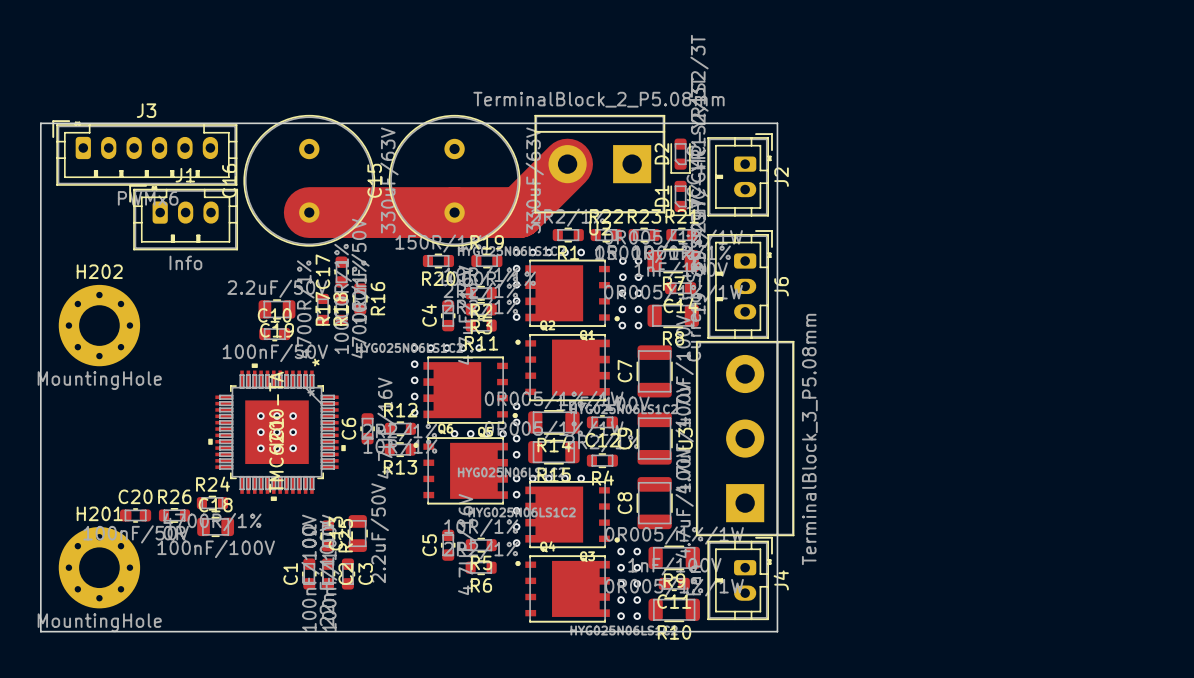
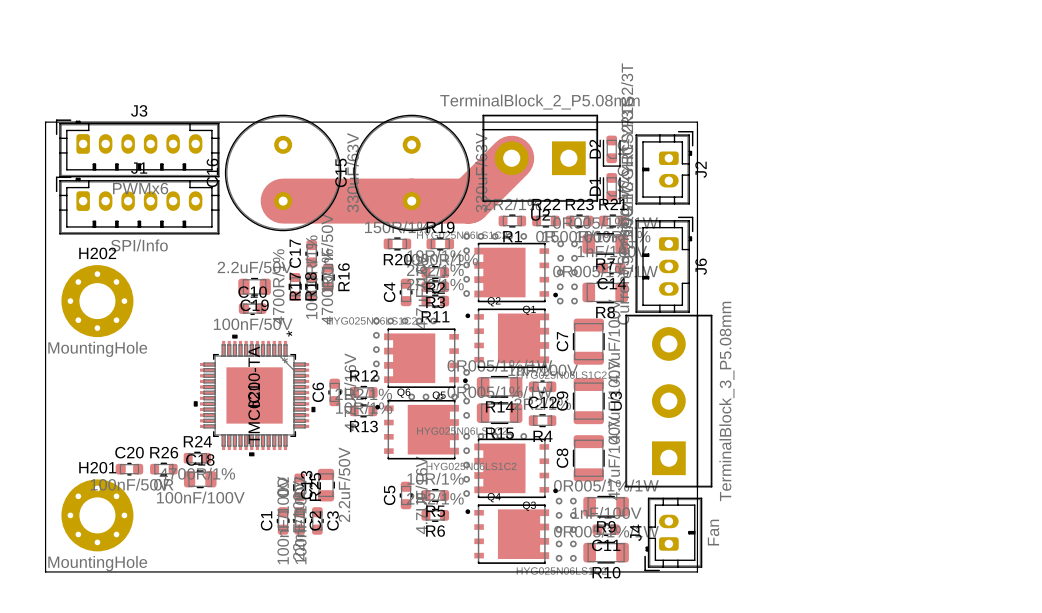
J1 footprint: [129, 184, 238, 251] -> [55, 176, 220, 235]
J1 value: Info (185, 262) -> SPI/Info (139, 245)
via: (260, 416) -> none
via: (277, 416) -> none
via: (293, 416) -> none
via: (260, 432) -> none
via: (277, 432) -> none
via: (293, 432) -> none
via: (260, 448) -> none
via: (277, 448) -> none
via: (293, 448) -> none
J4 rotation: 0° (740, 578) -> 180° (673, 534)

